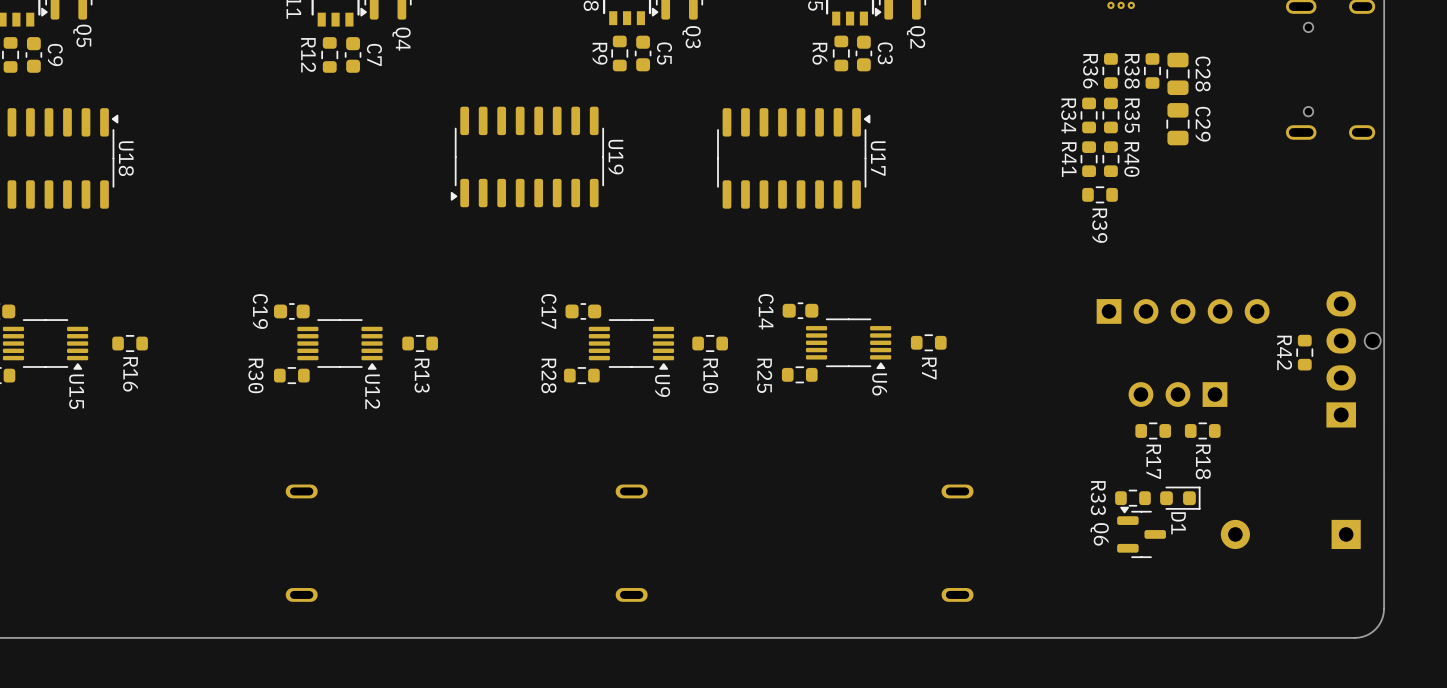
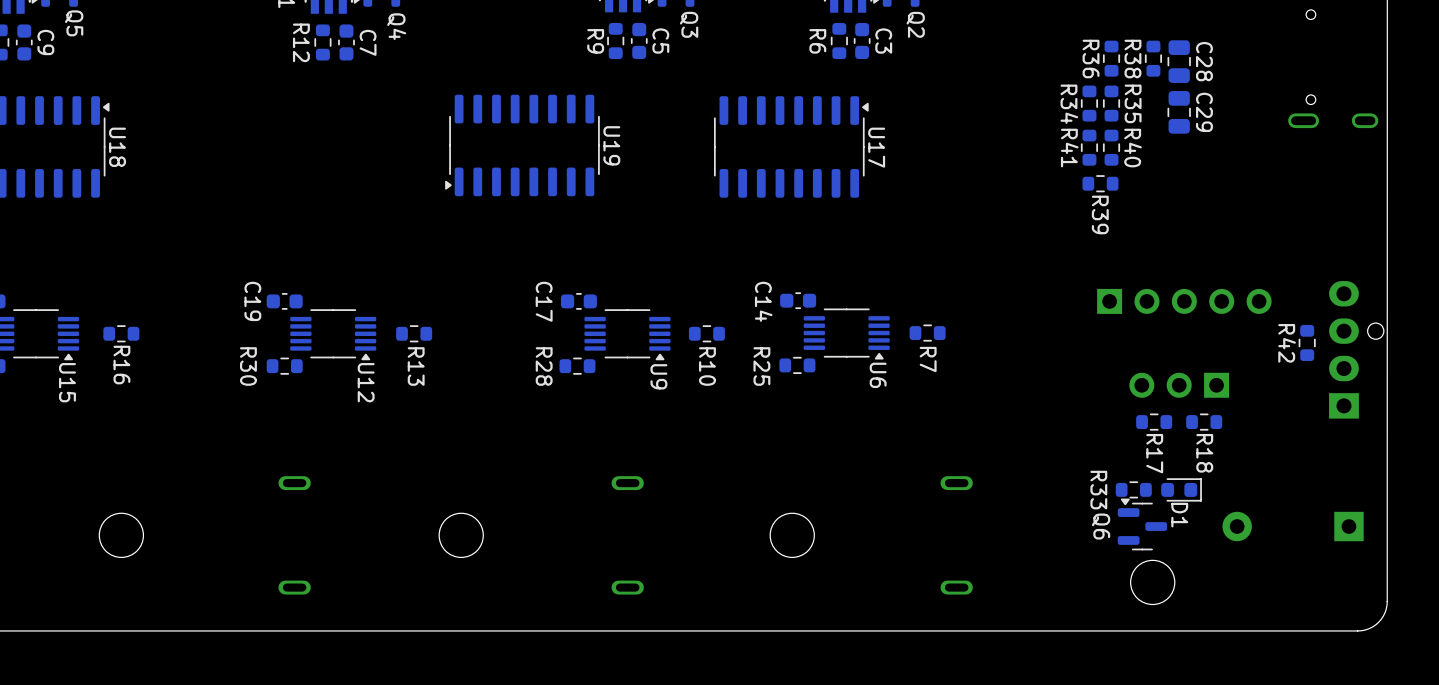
round board edge: none -> [98, 512, 144, 558]
round board edge: none -> [438, 512, 484, 558]
round board edge: none -> [769, 512, 815, 558]
round board edge: none -> [1130, 559, 1176, 605]

